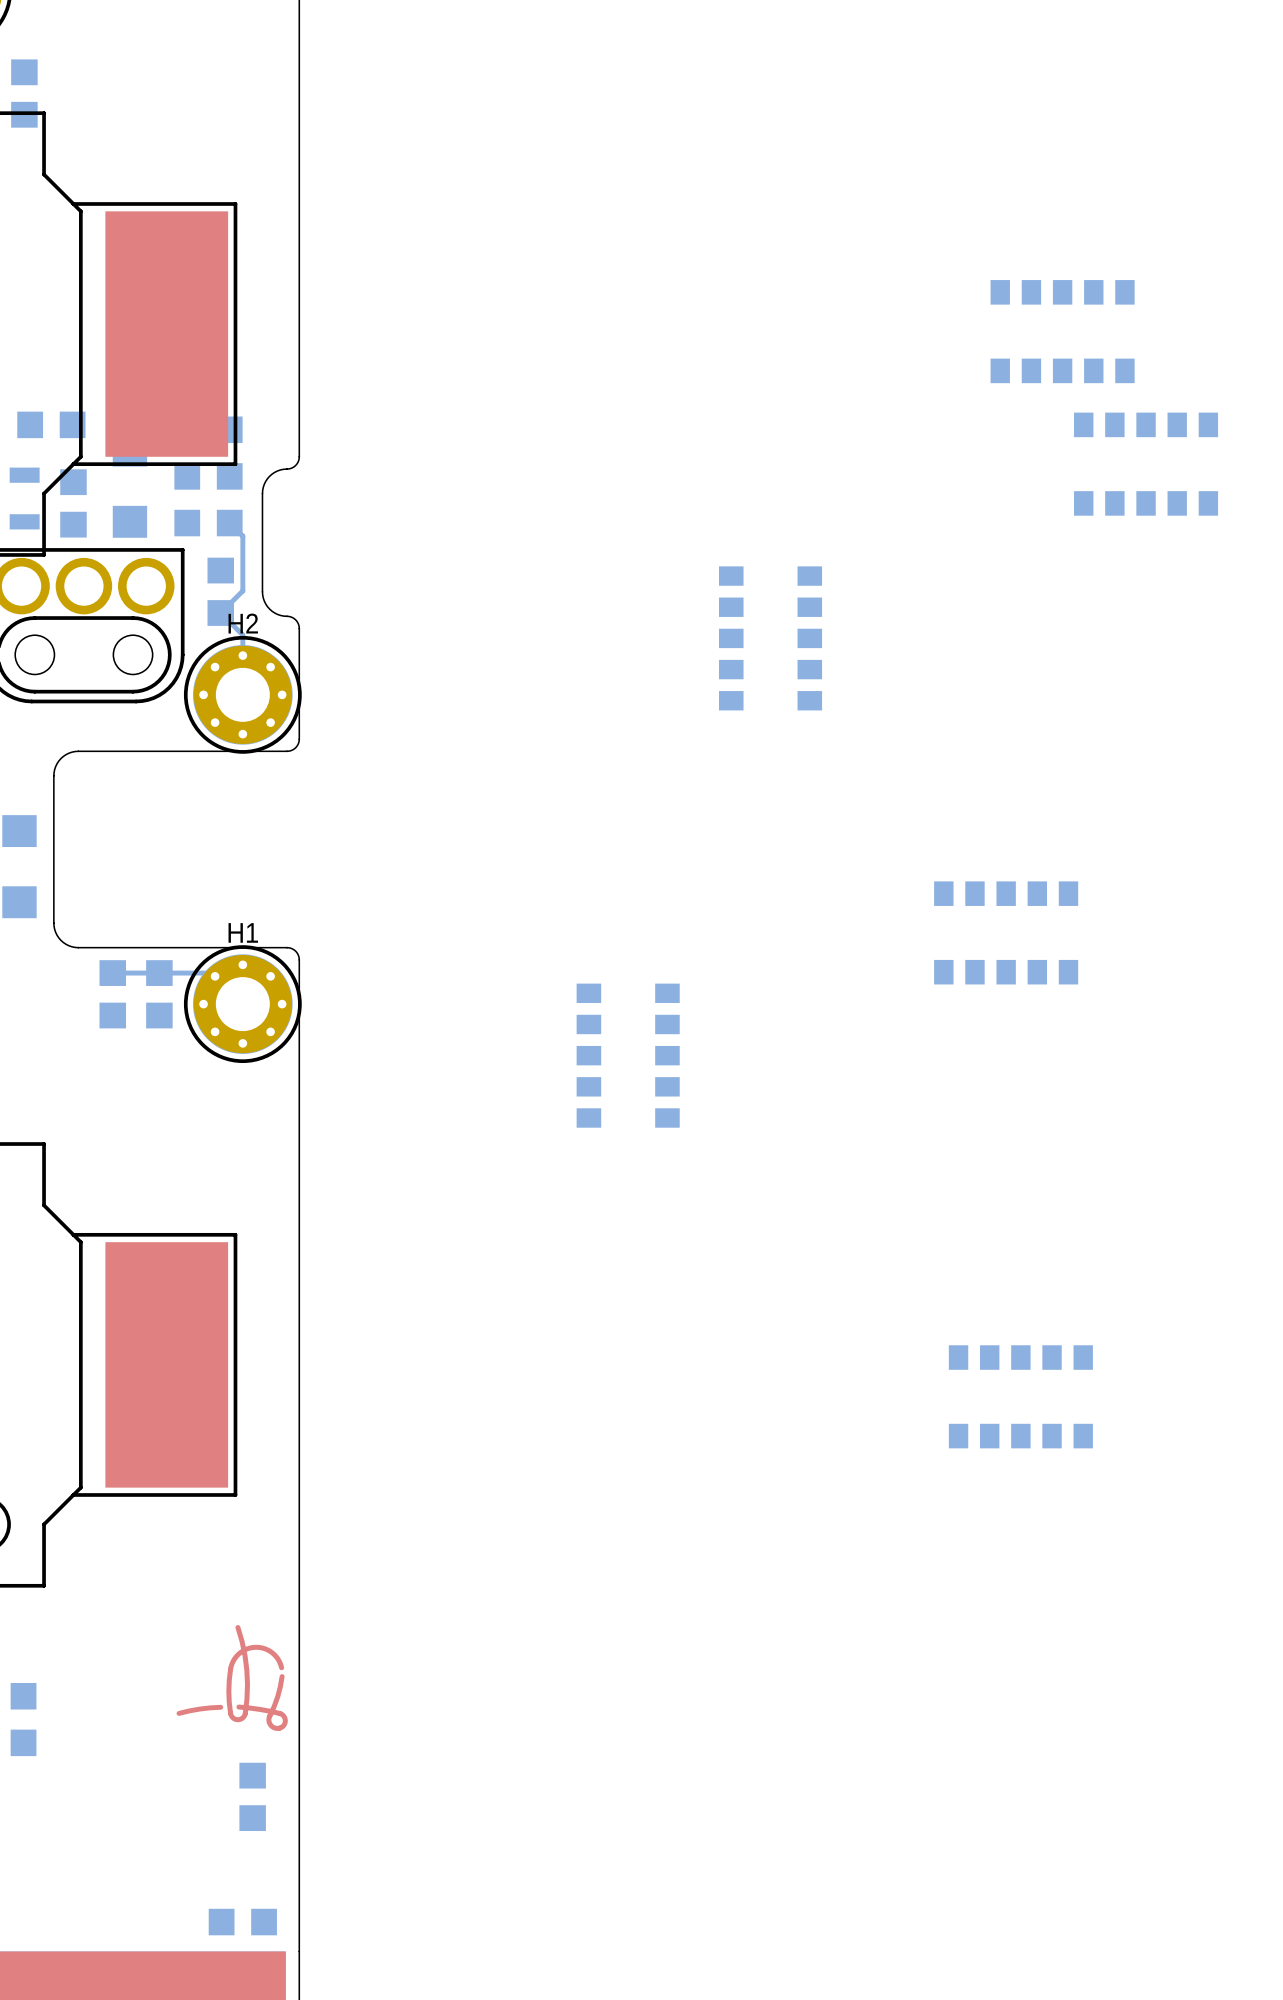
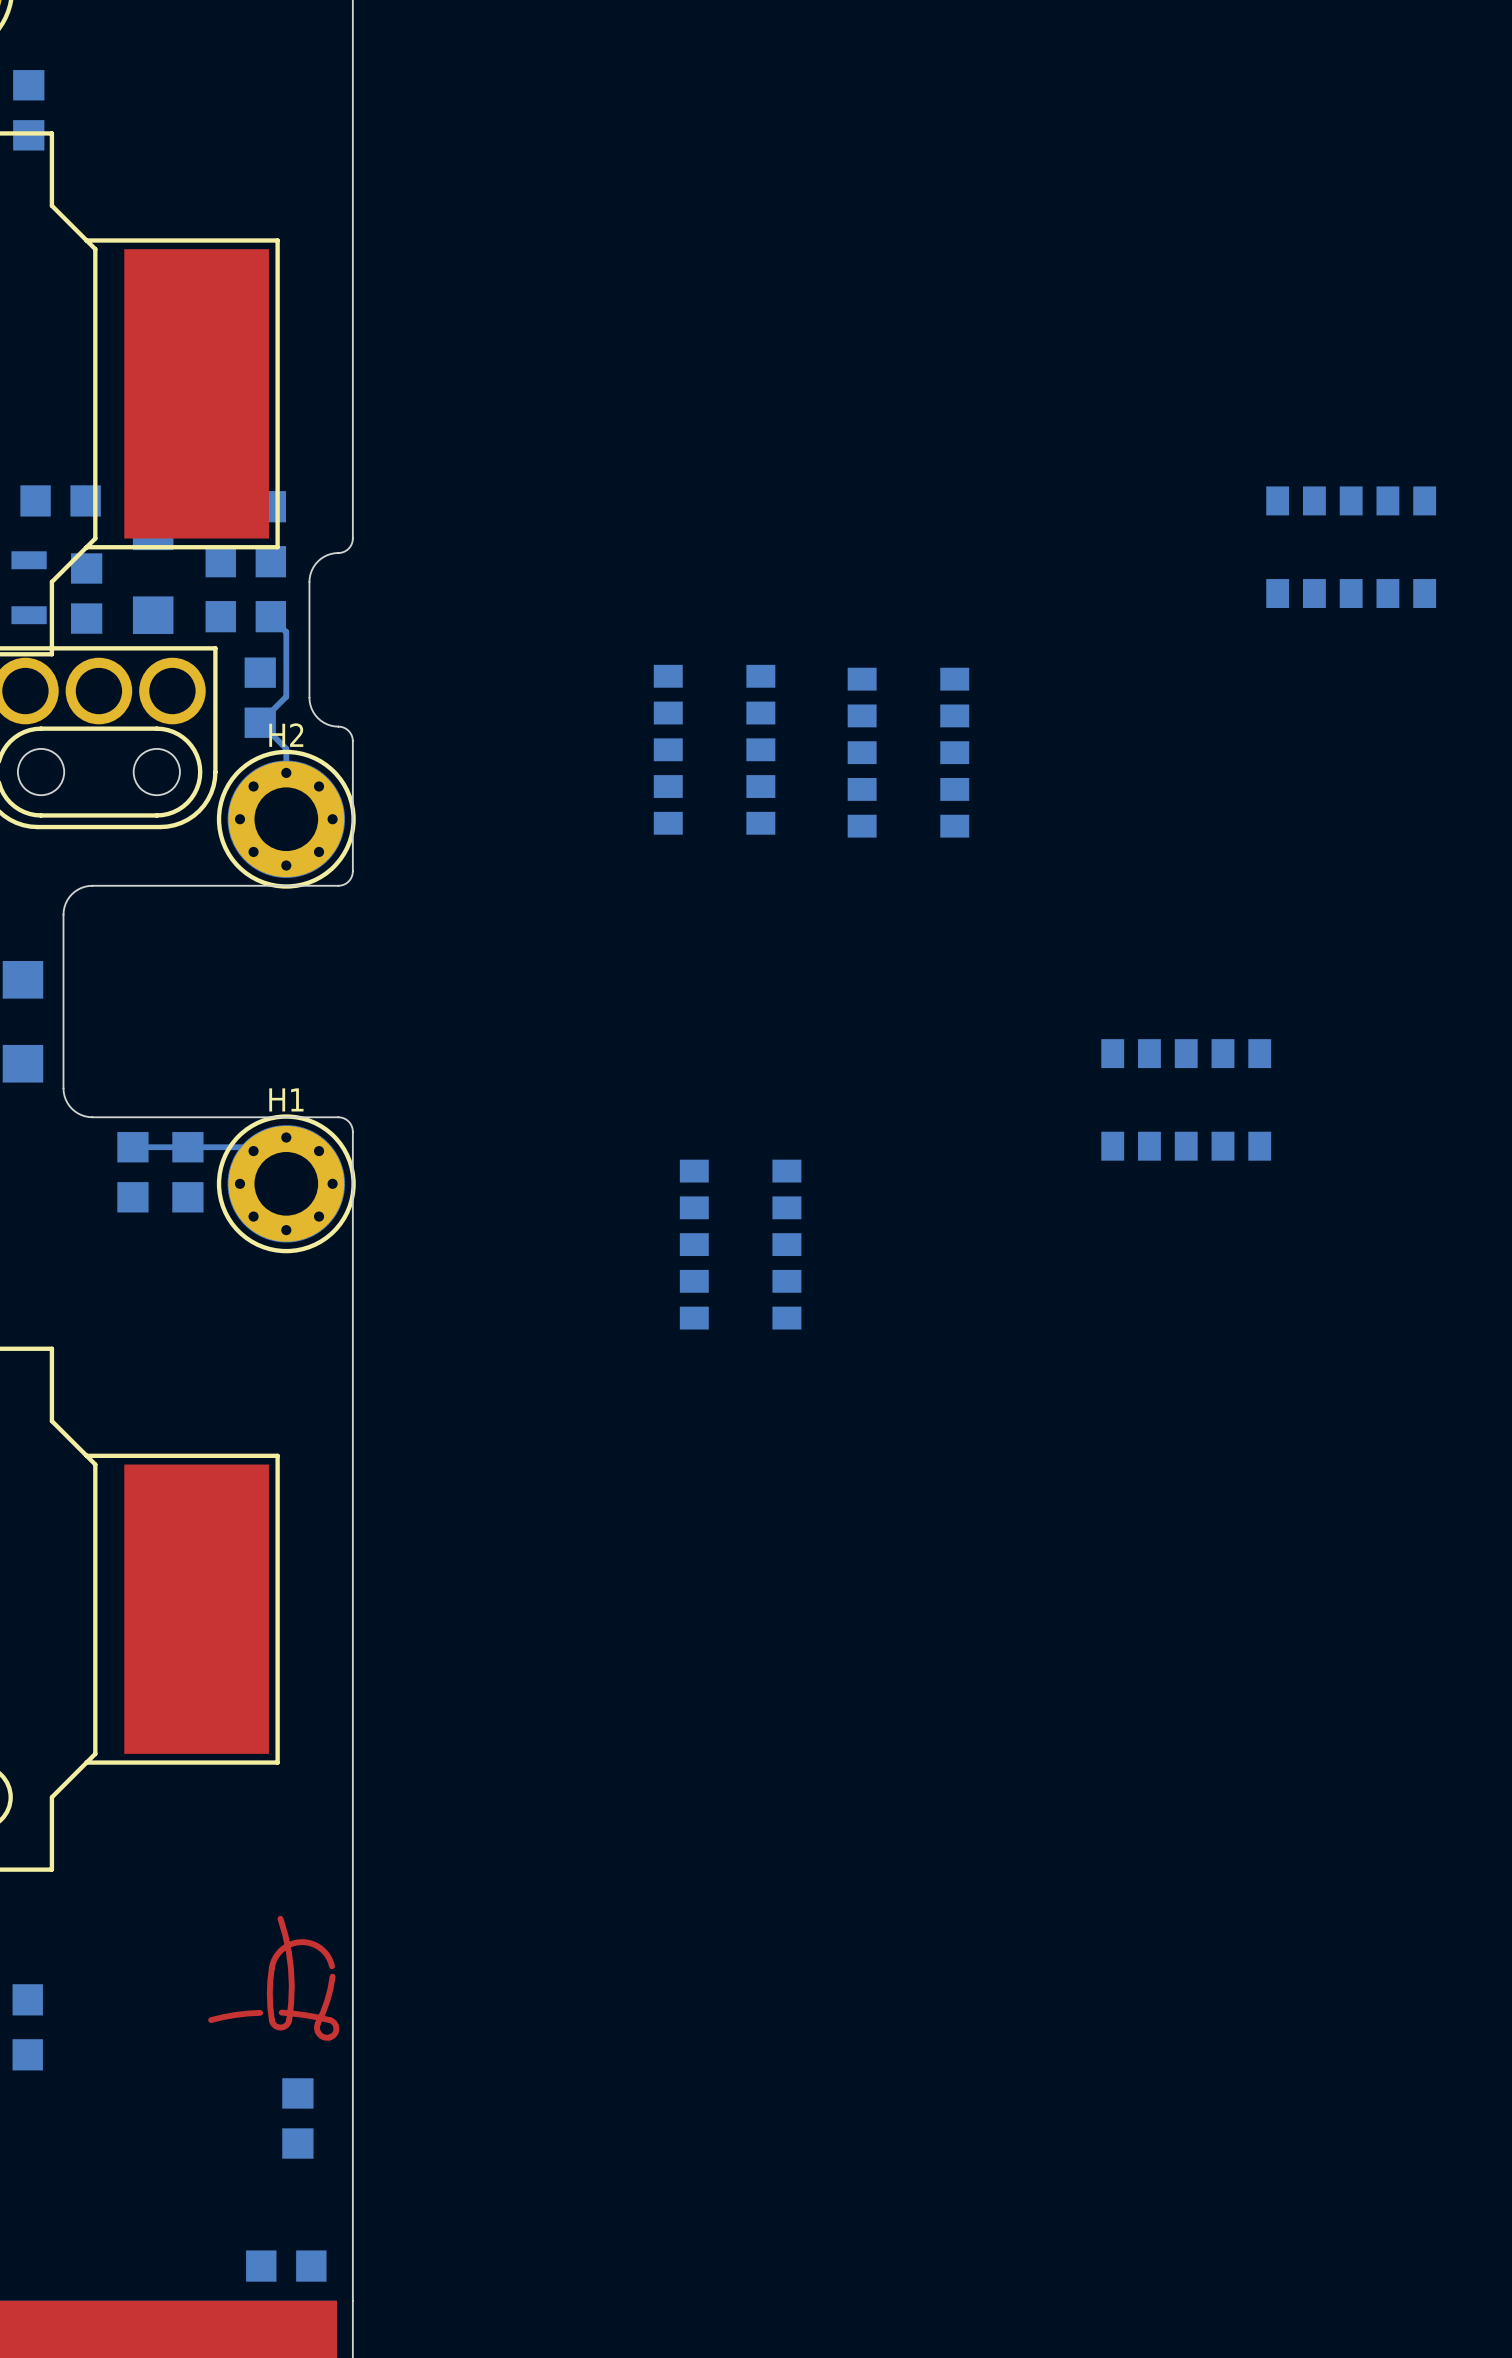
part: (1062, 331) -> none
part: none -> (714, 749)
part: (1020, 1396) -> none

